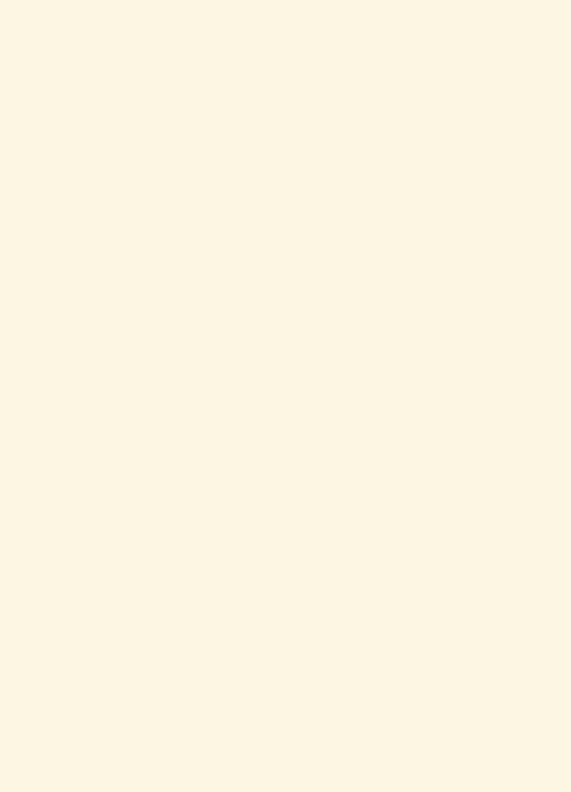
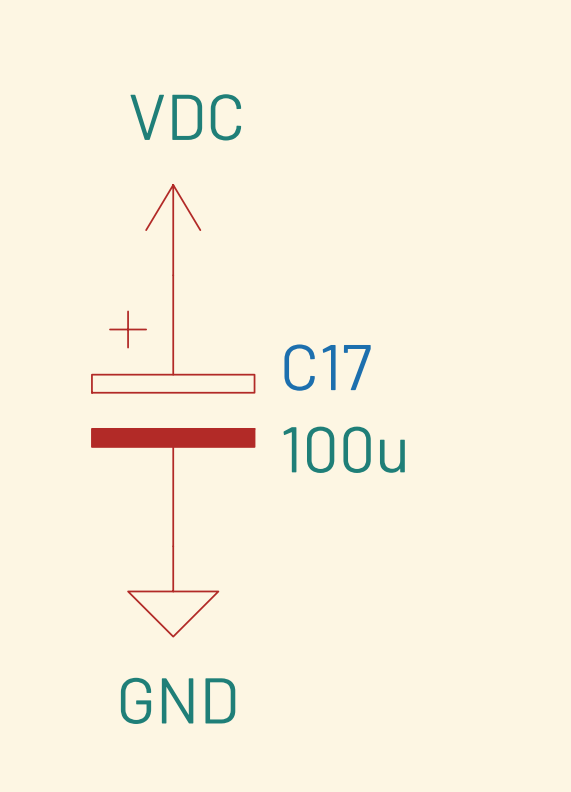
power symbol: none -> VDC (173, 230)
C17: none -> 100u (173, 410)
power symbol: none -> GND (173, 591)

